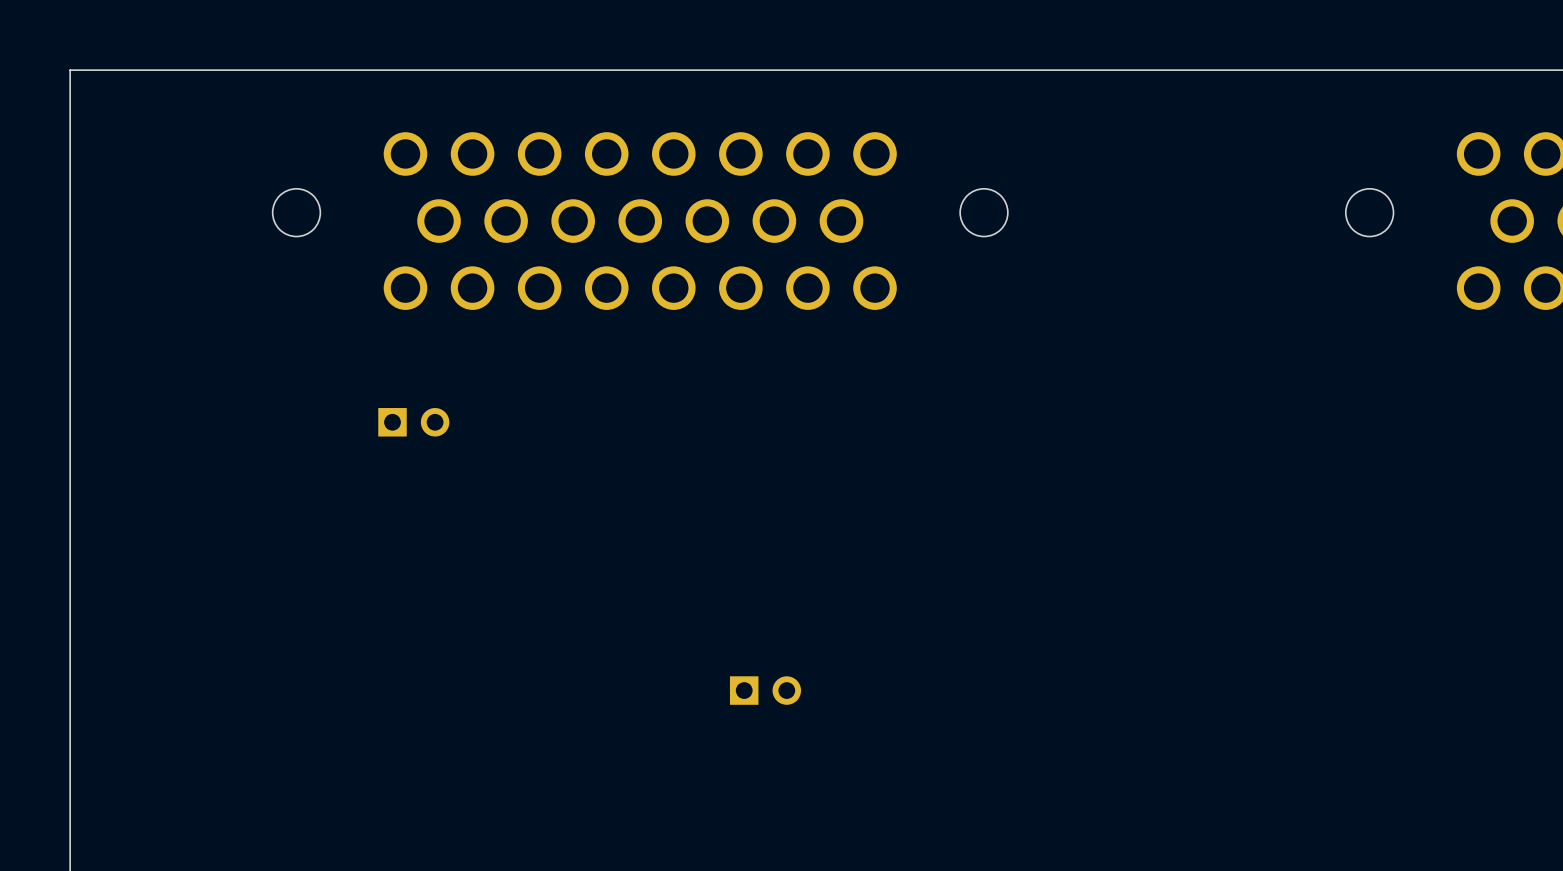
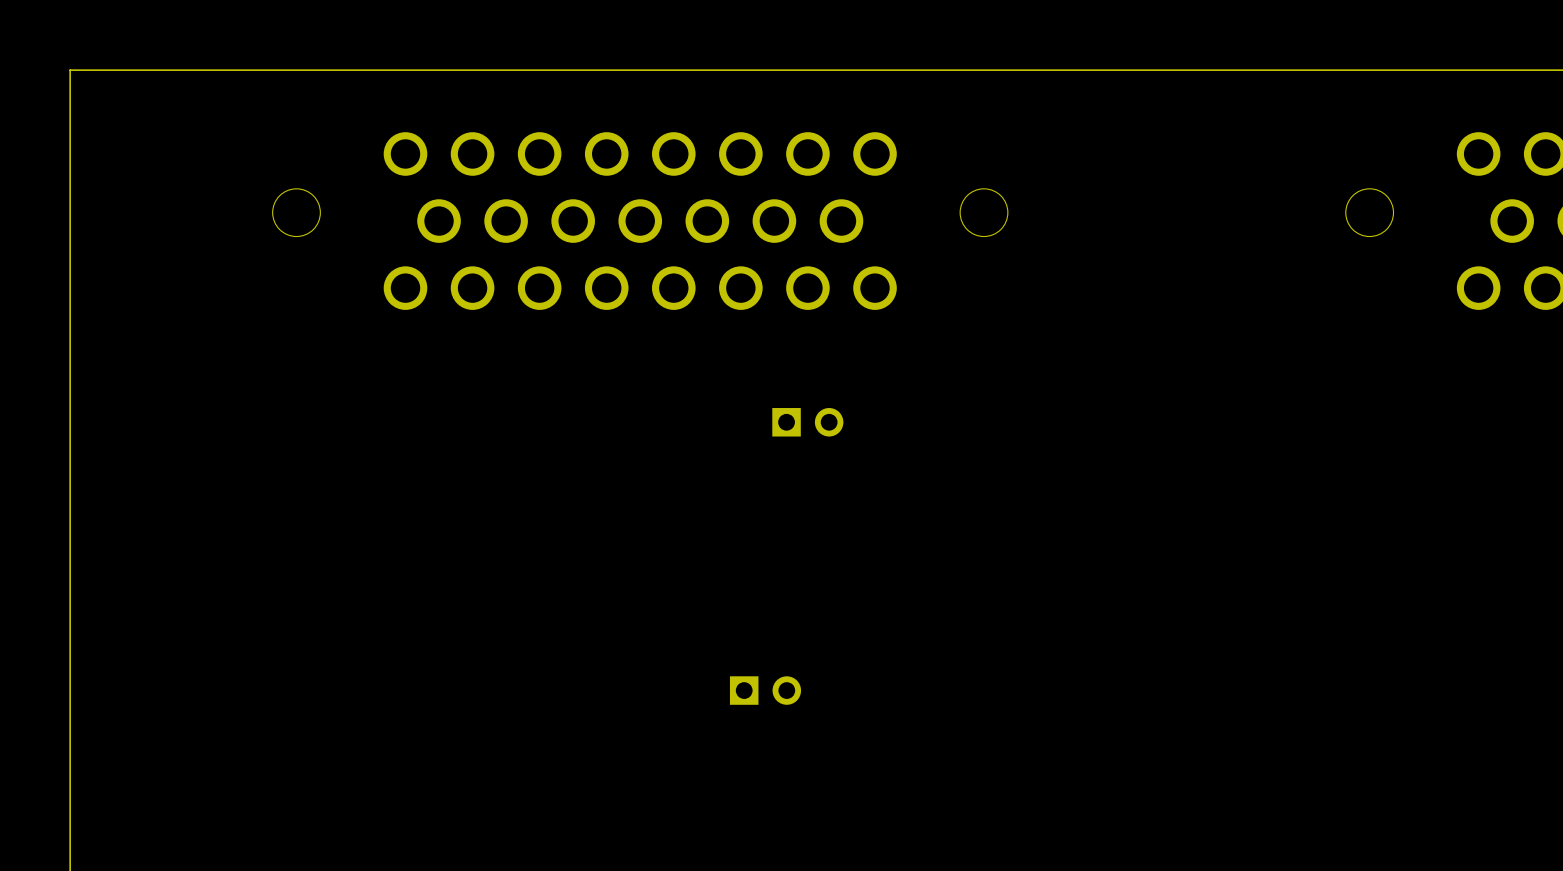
part position: (413, 422) -> (807, 422)

